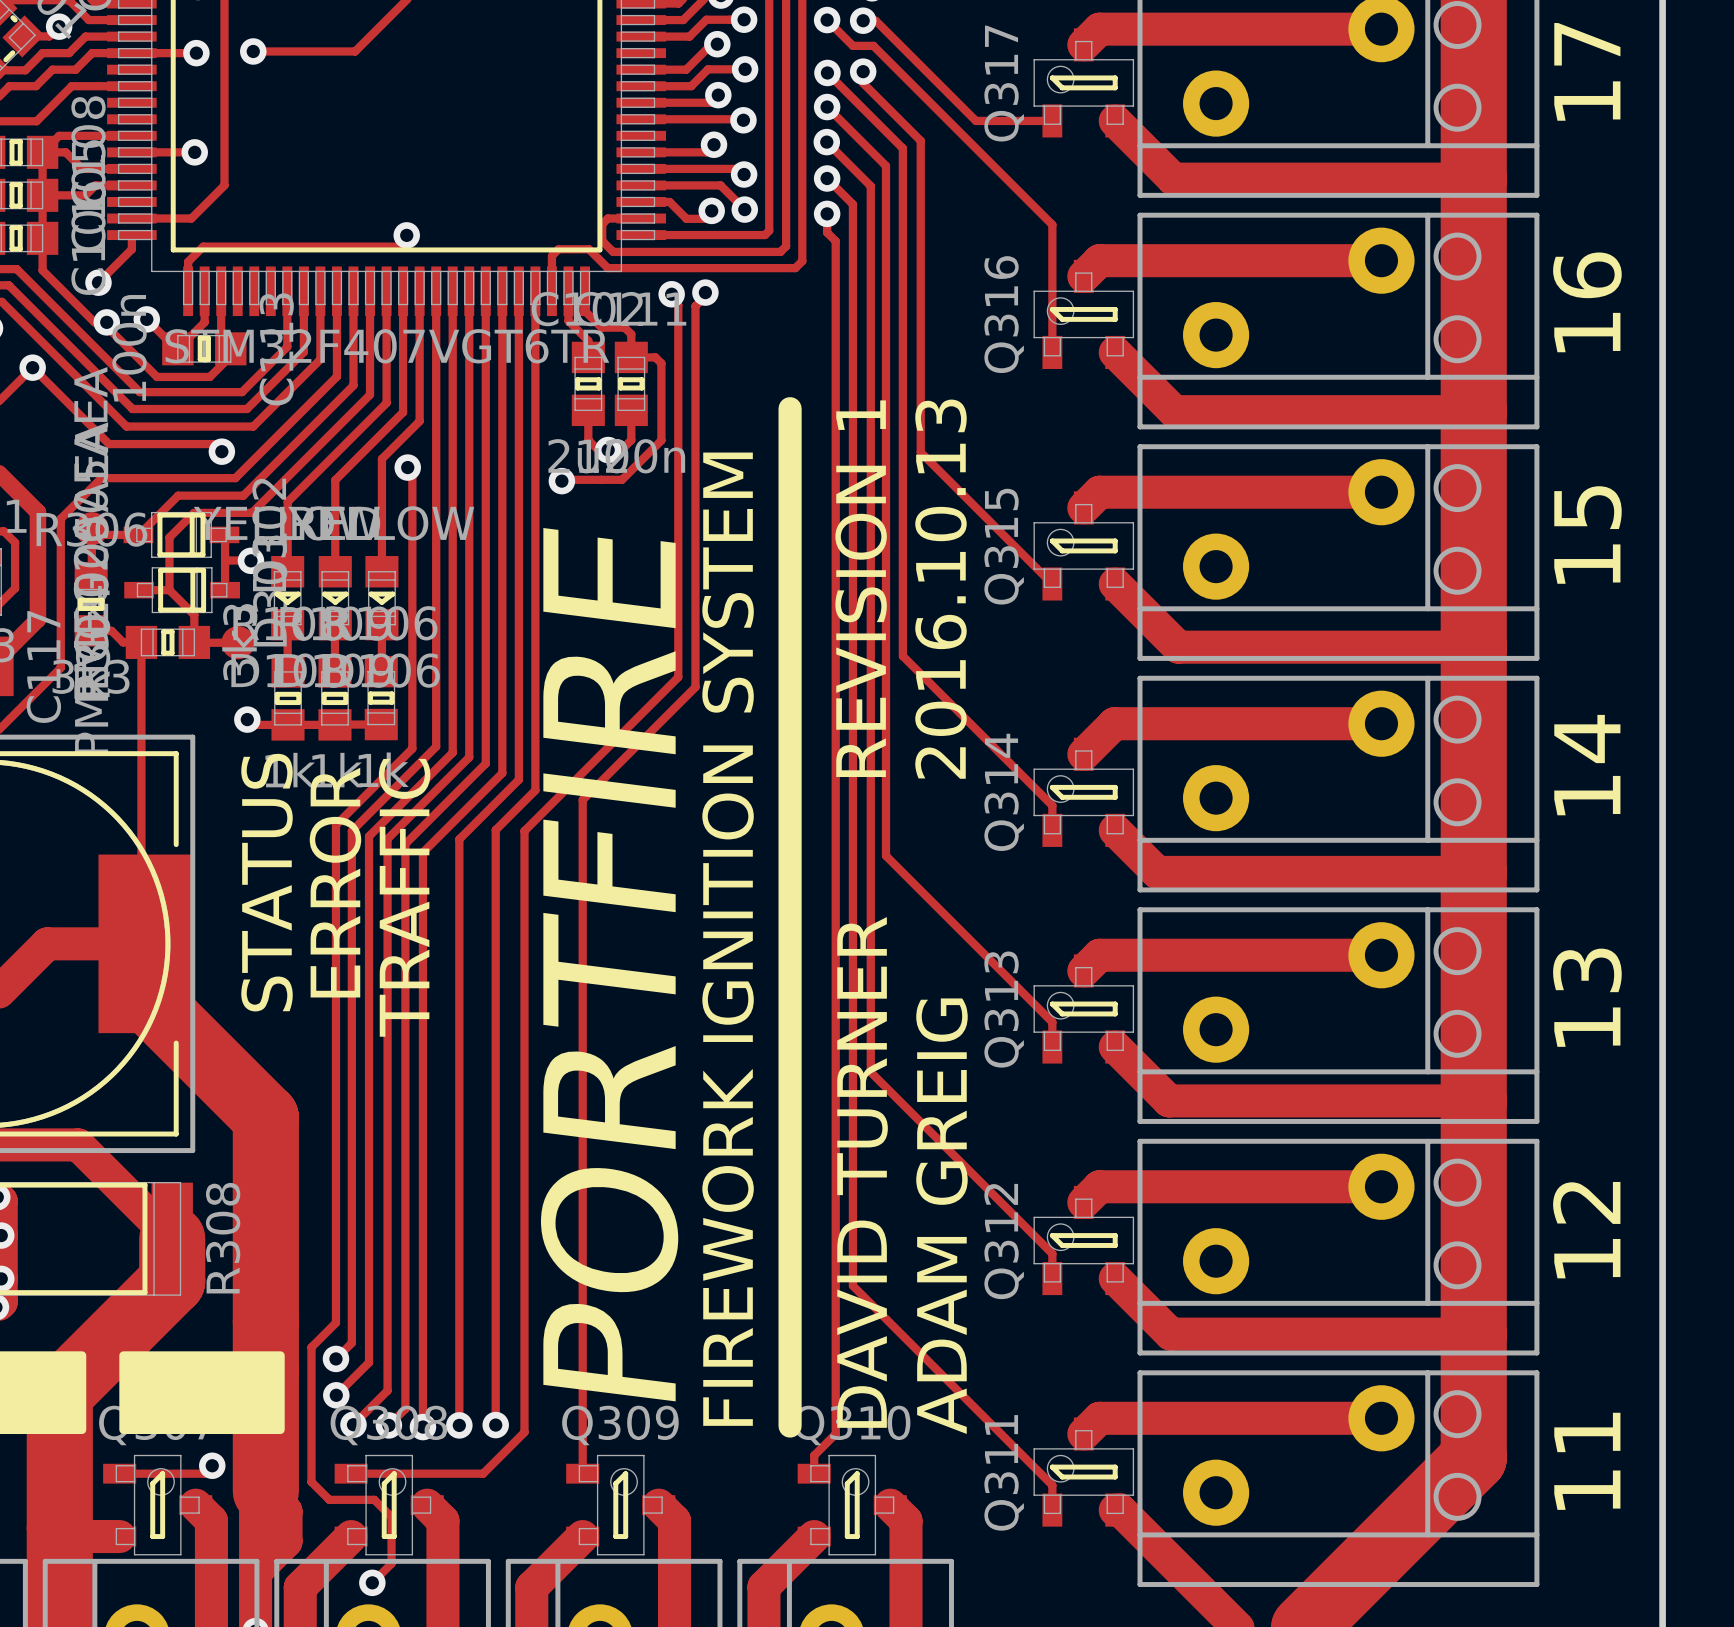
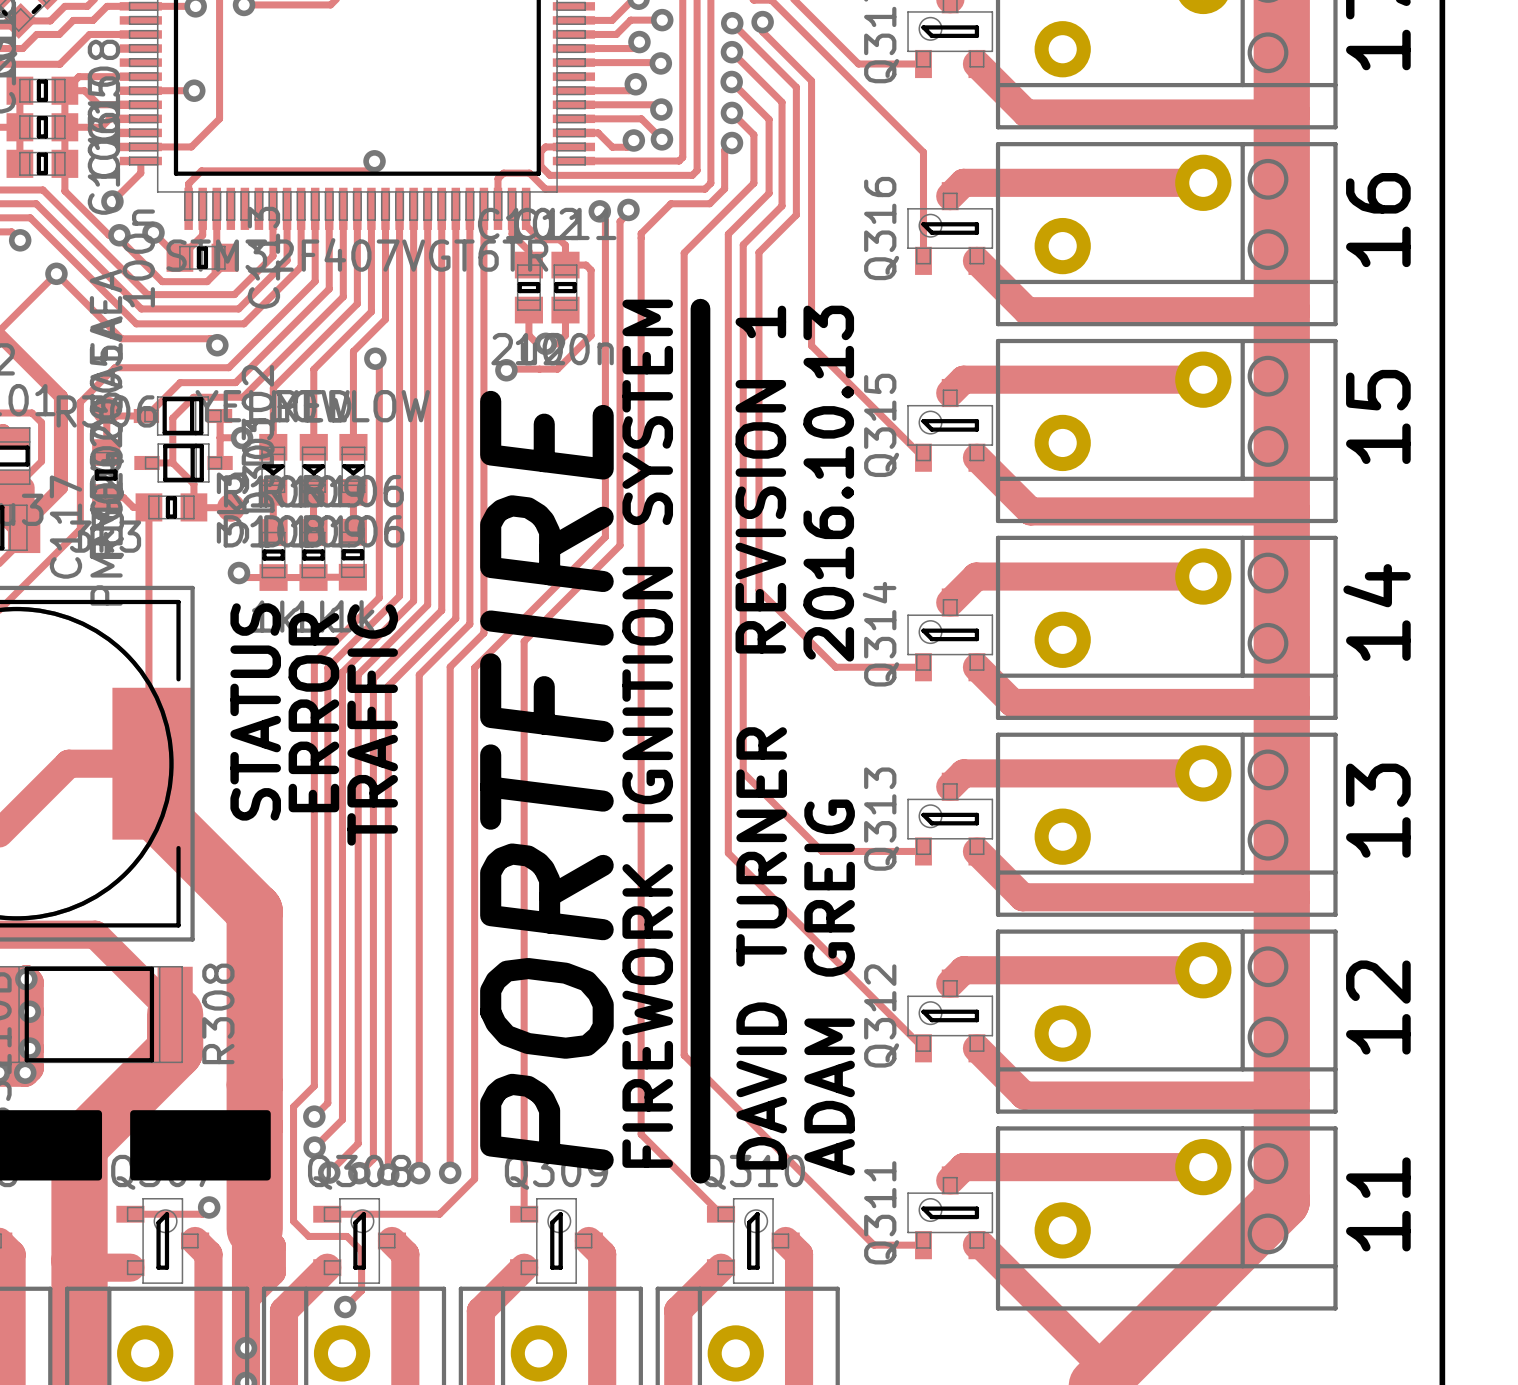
track: (827, 213) (827, 232) (835, 241) (835, 1434) (814, 1455) (814, 1473) -> (731, 143) (724, 150) (724, 188) (709, 203) (670, 203) (641, 233) (641, 1134) (721, 1214)
track: (852, 261) (852, 1285) (1052, 1485) (1052, 1510) -> (753, 183) (684, 252) (684, 1055) (873, 1245) (923, 1245)
track: (870, 273) (870, 1072) (1052, 1253) (1052, 1278) -> (769, 193) (728, 234) (728, 853) (923, 1048)
track: (886, 287) (886, 855) (1052, 1022) (1052, 1047) -> (782, 206) (743, 244) (743, 772) (821, 851) (923, 851)
track: (902, 298) (902, 656) (1052, 805) (1052, 830) -> (796, 215) (758, 252) (758, 590) (835, 667) (923, 667)

